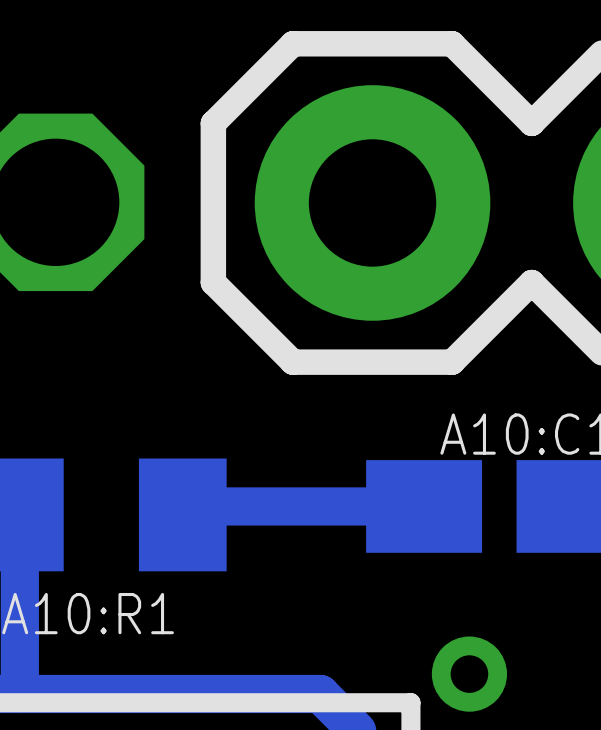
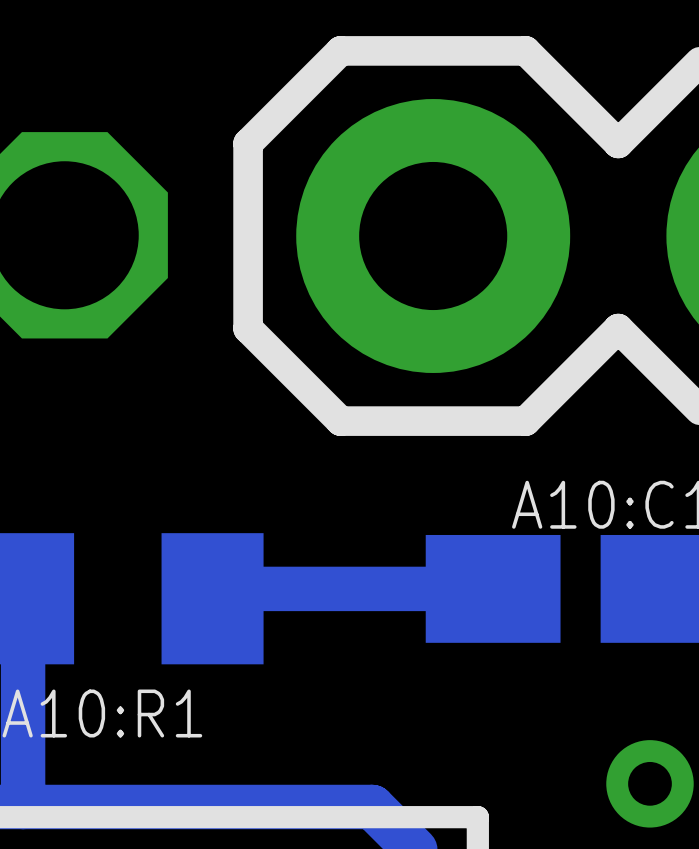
via: (469, 674) -> none
via: none -> (649, 783)

